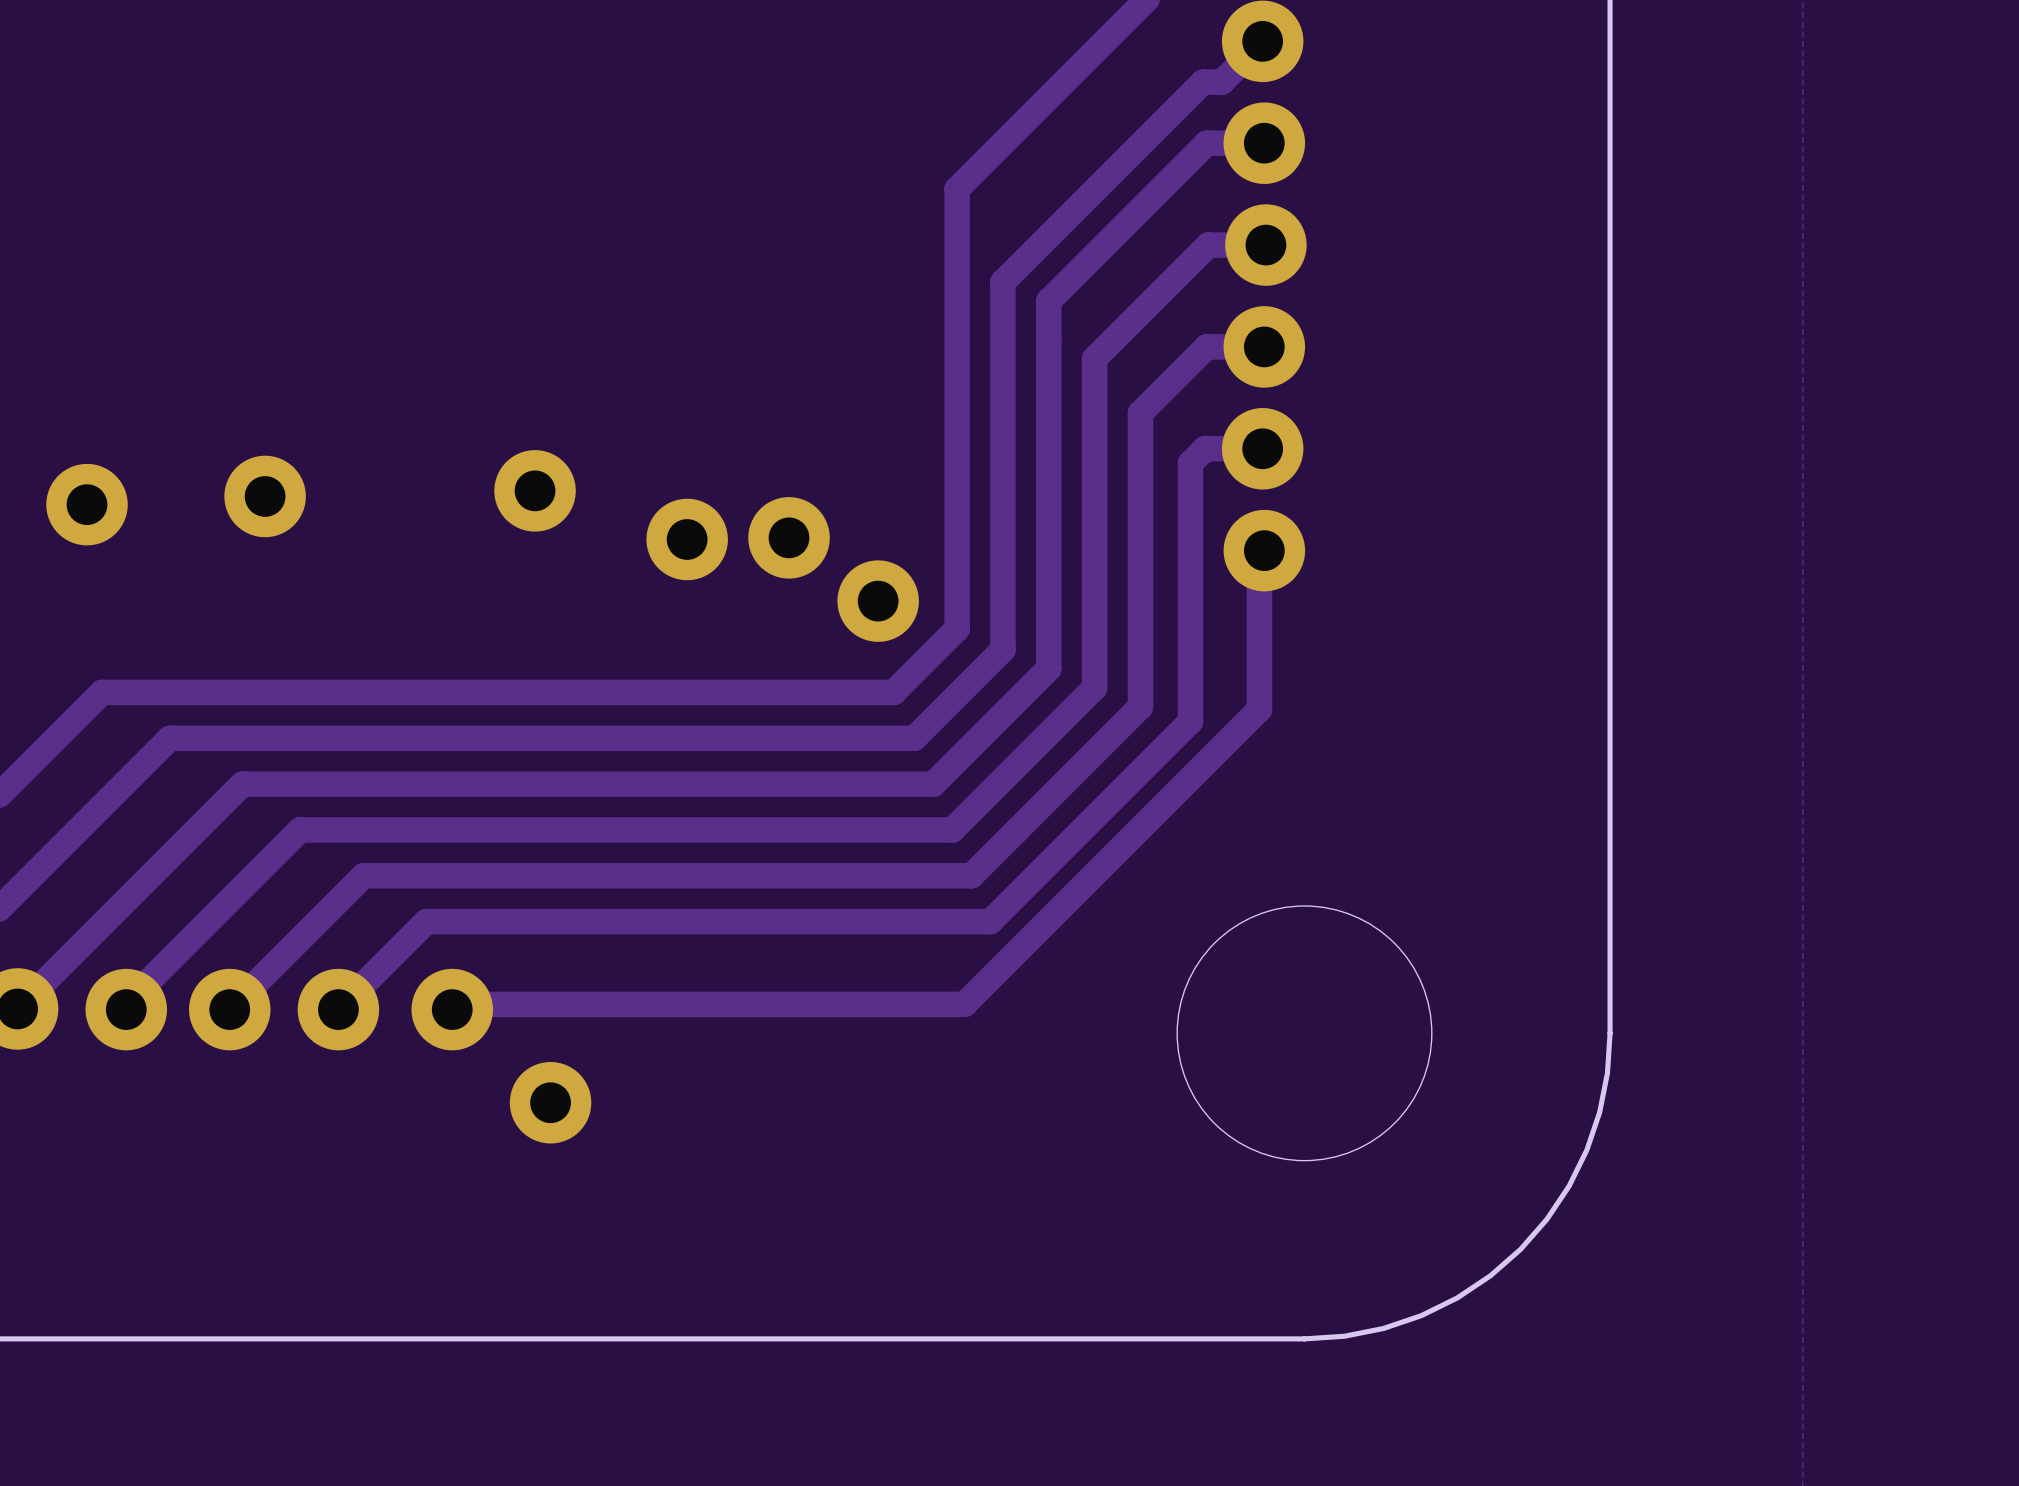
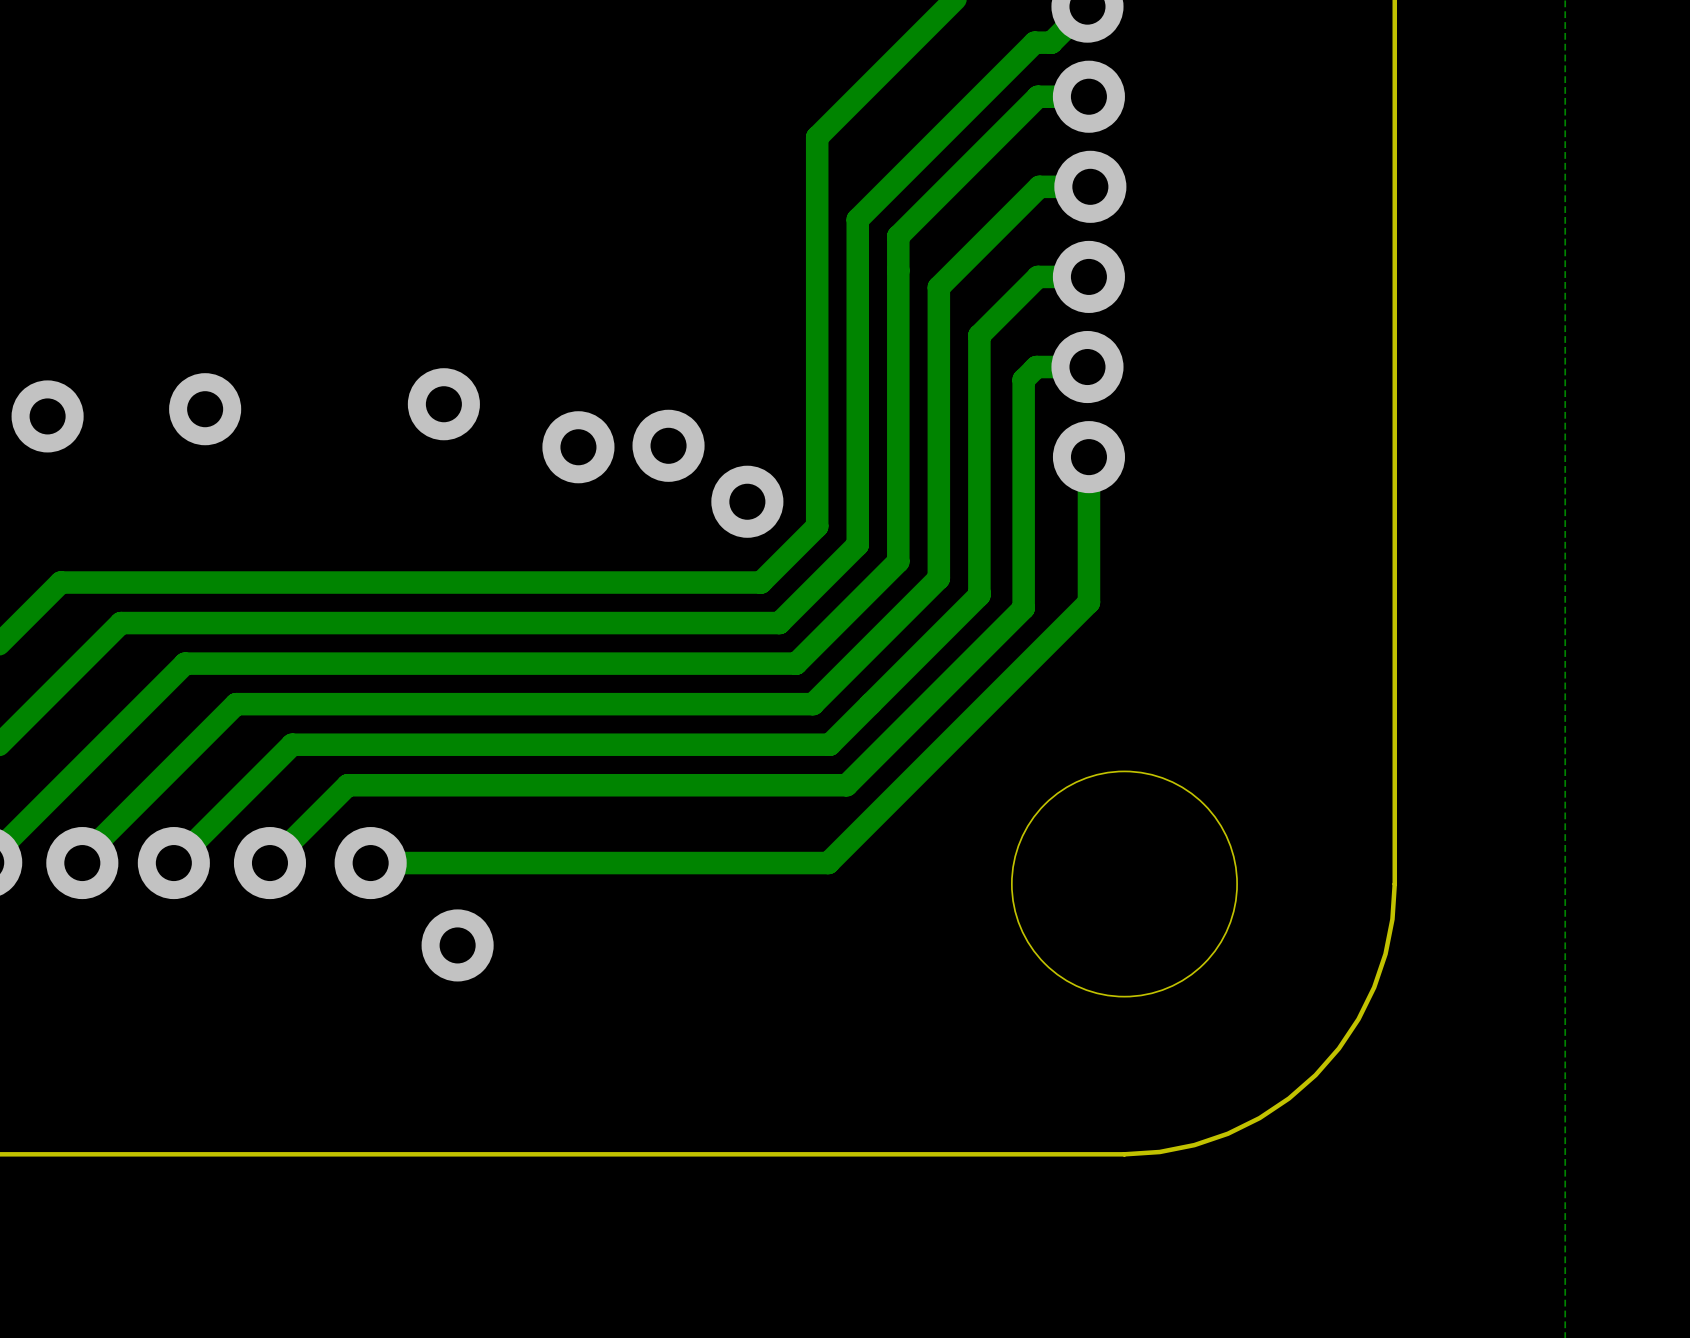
track: (1259, 545) (1259, 709) (964, 1004) -> none
track: none -> (1088, 457) (1088, 602) (828, 863) (370, 863)
track: (964, 1004) (447, 1004) -> none

